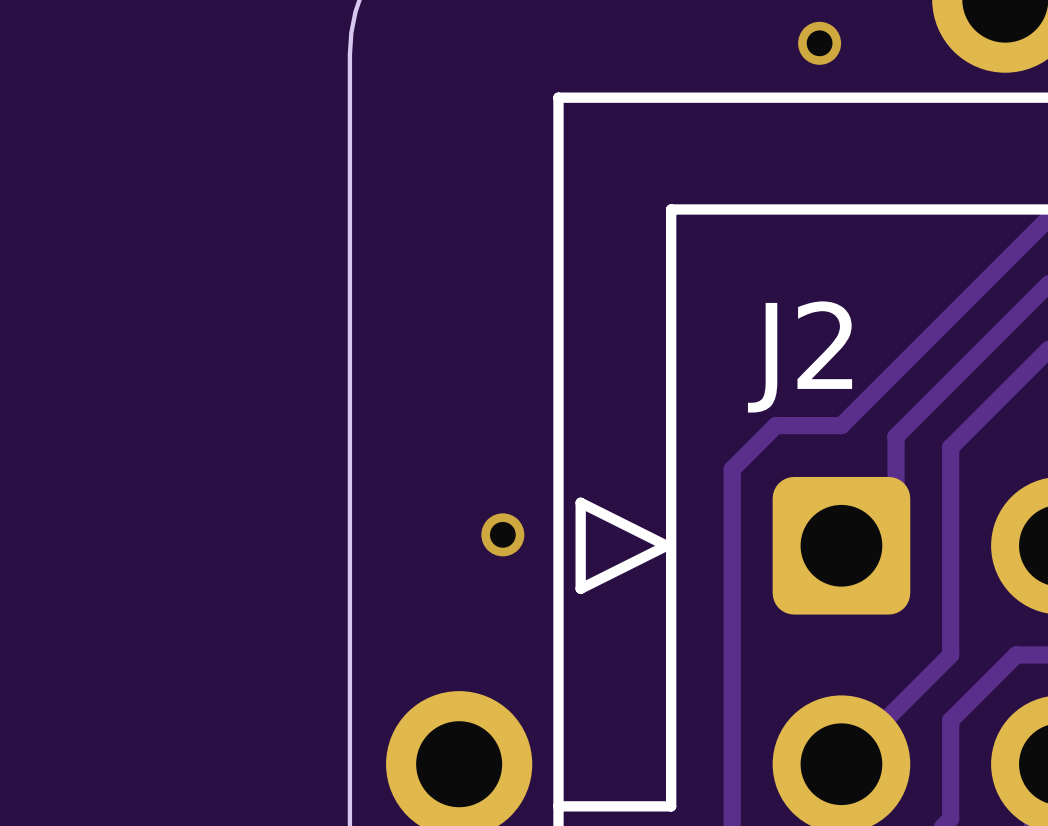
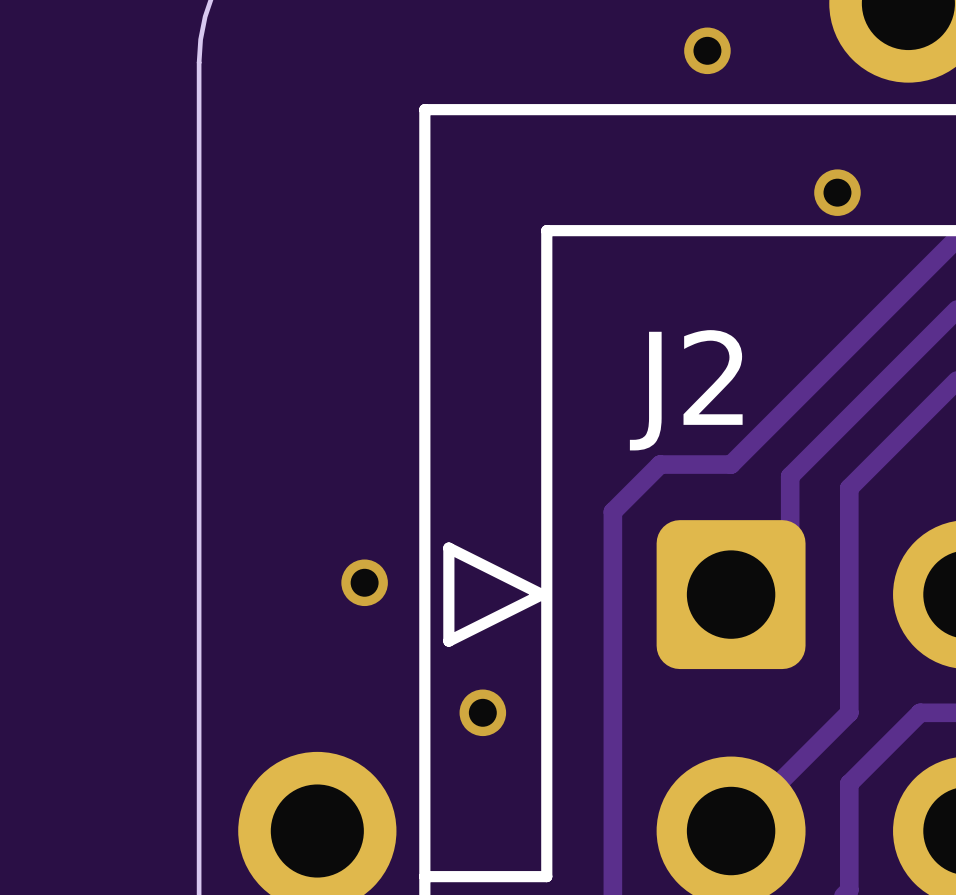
via: none -> (837, 192)
via: none -> (482, 712)

